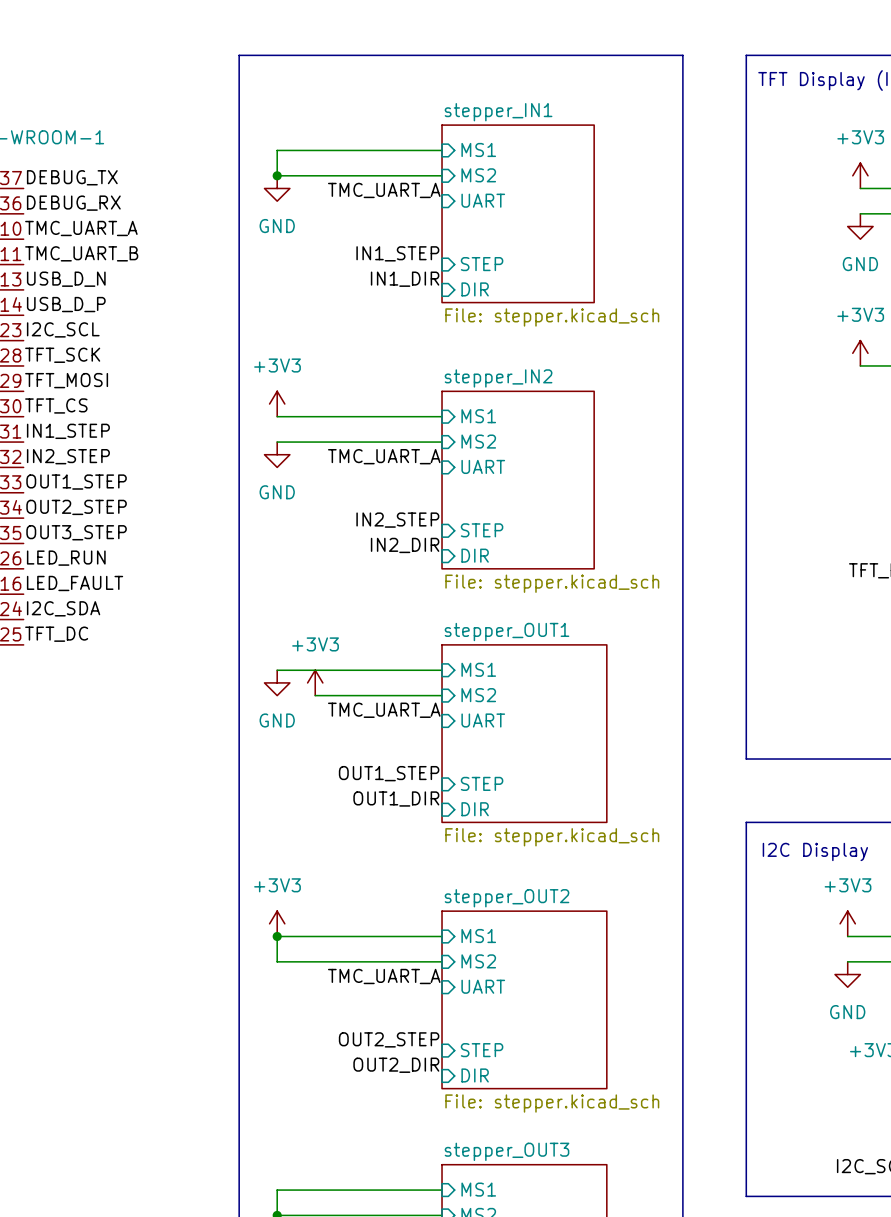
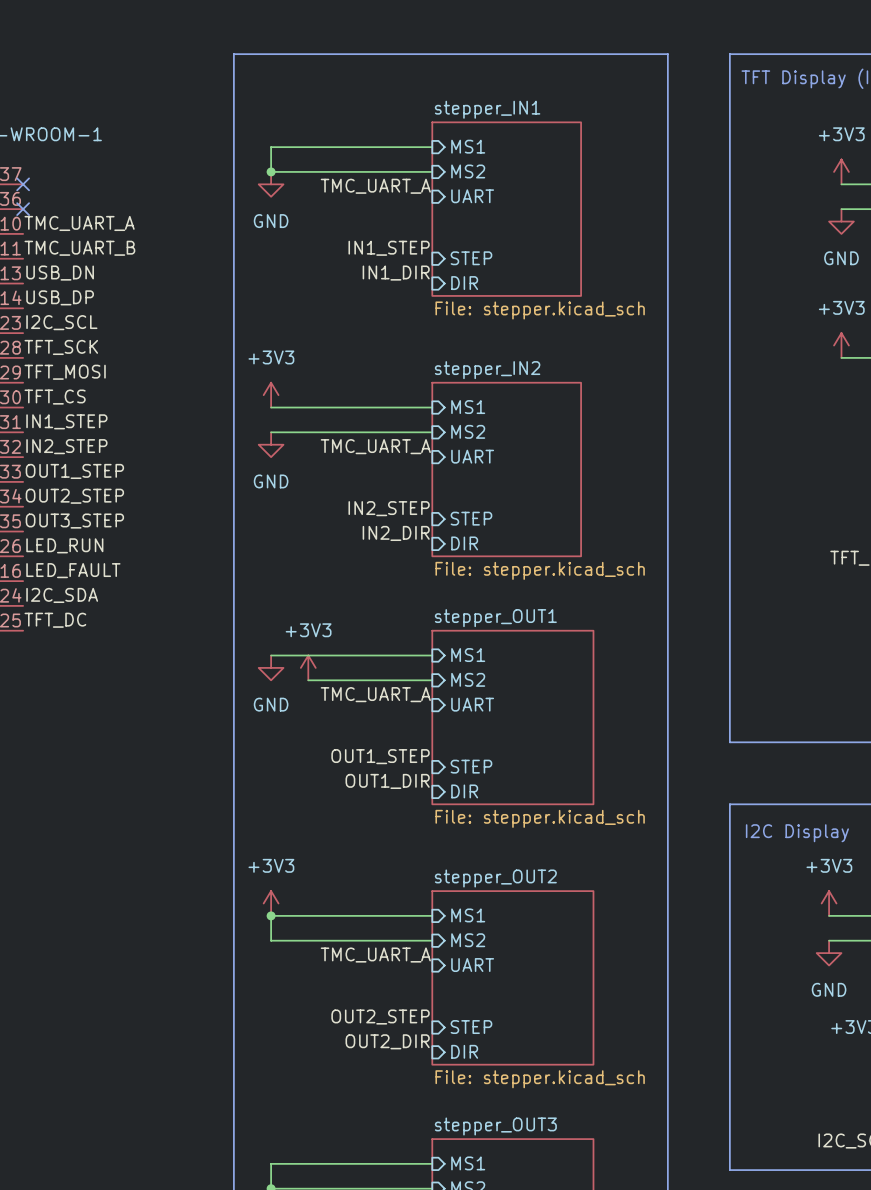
label: DEBUG_TX (72, 177) -> none
no-connect mark: none -> (23, 184)
label: DEBUG_RX (73, 203) -> none
no-connect mark: none -> (23, 209)
label: USB_D_N (66, 279) -> USB_DN (60, 273)
label: USB_D_P (66, 304) -> USB_DP (60, 297)

